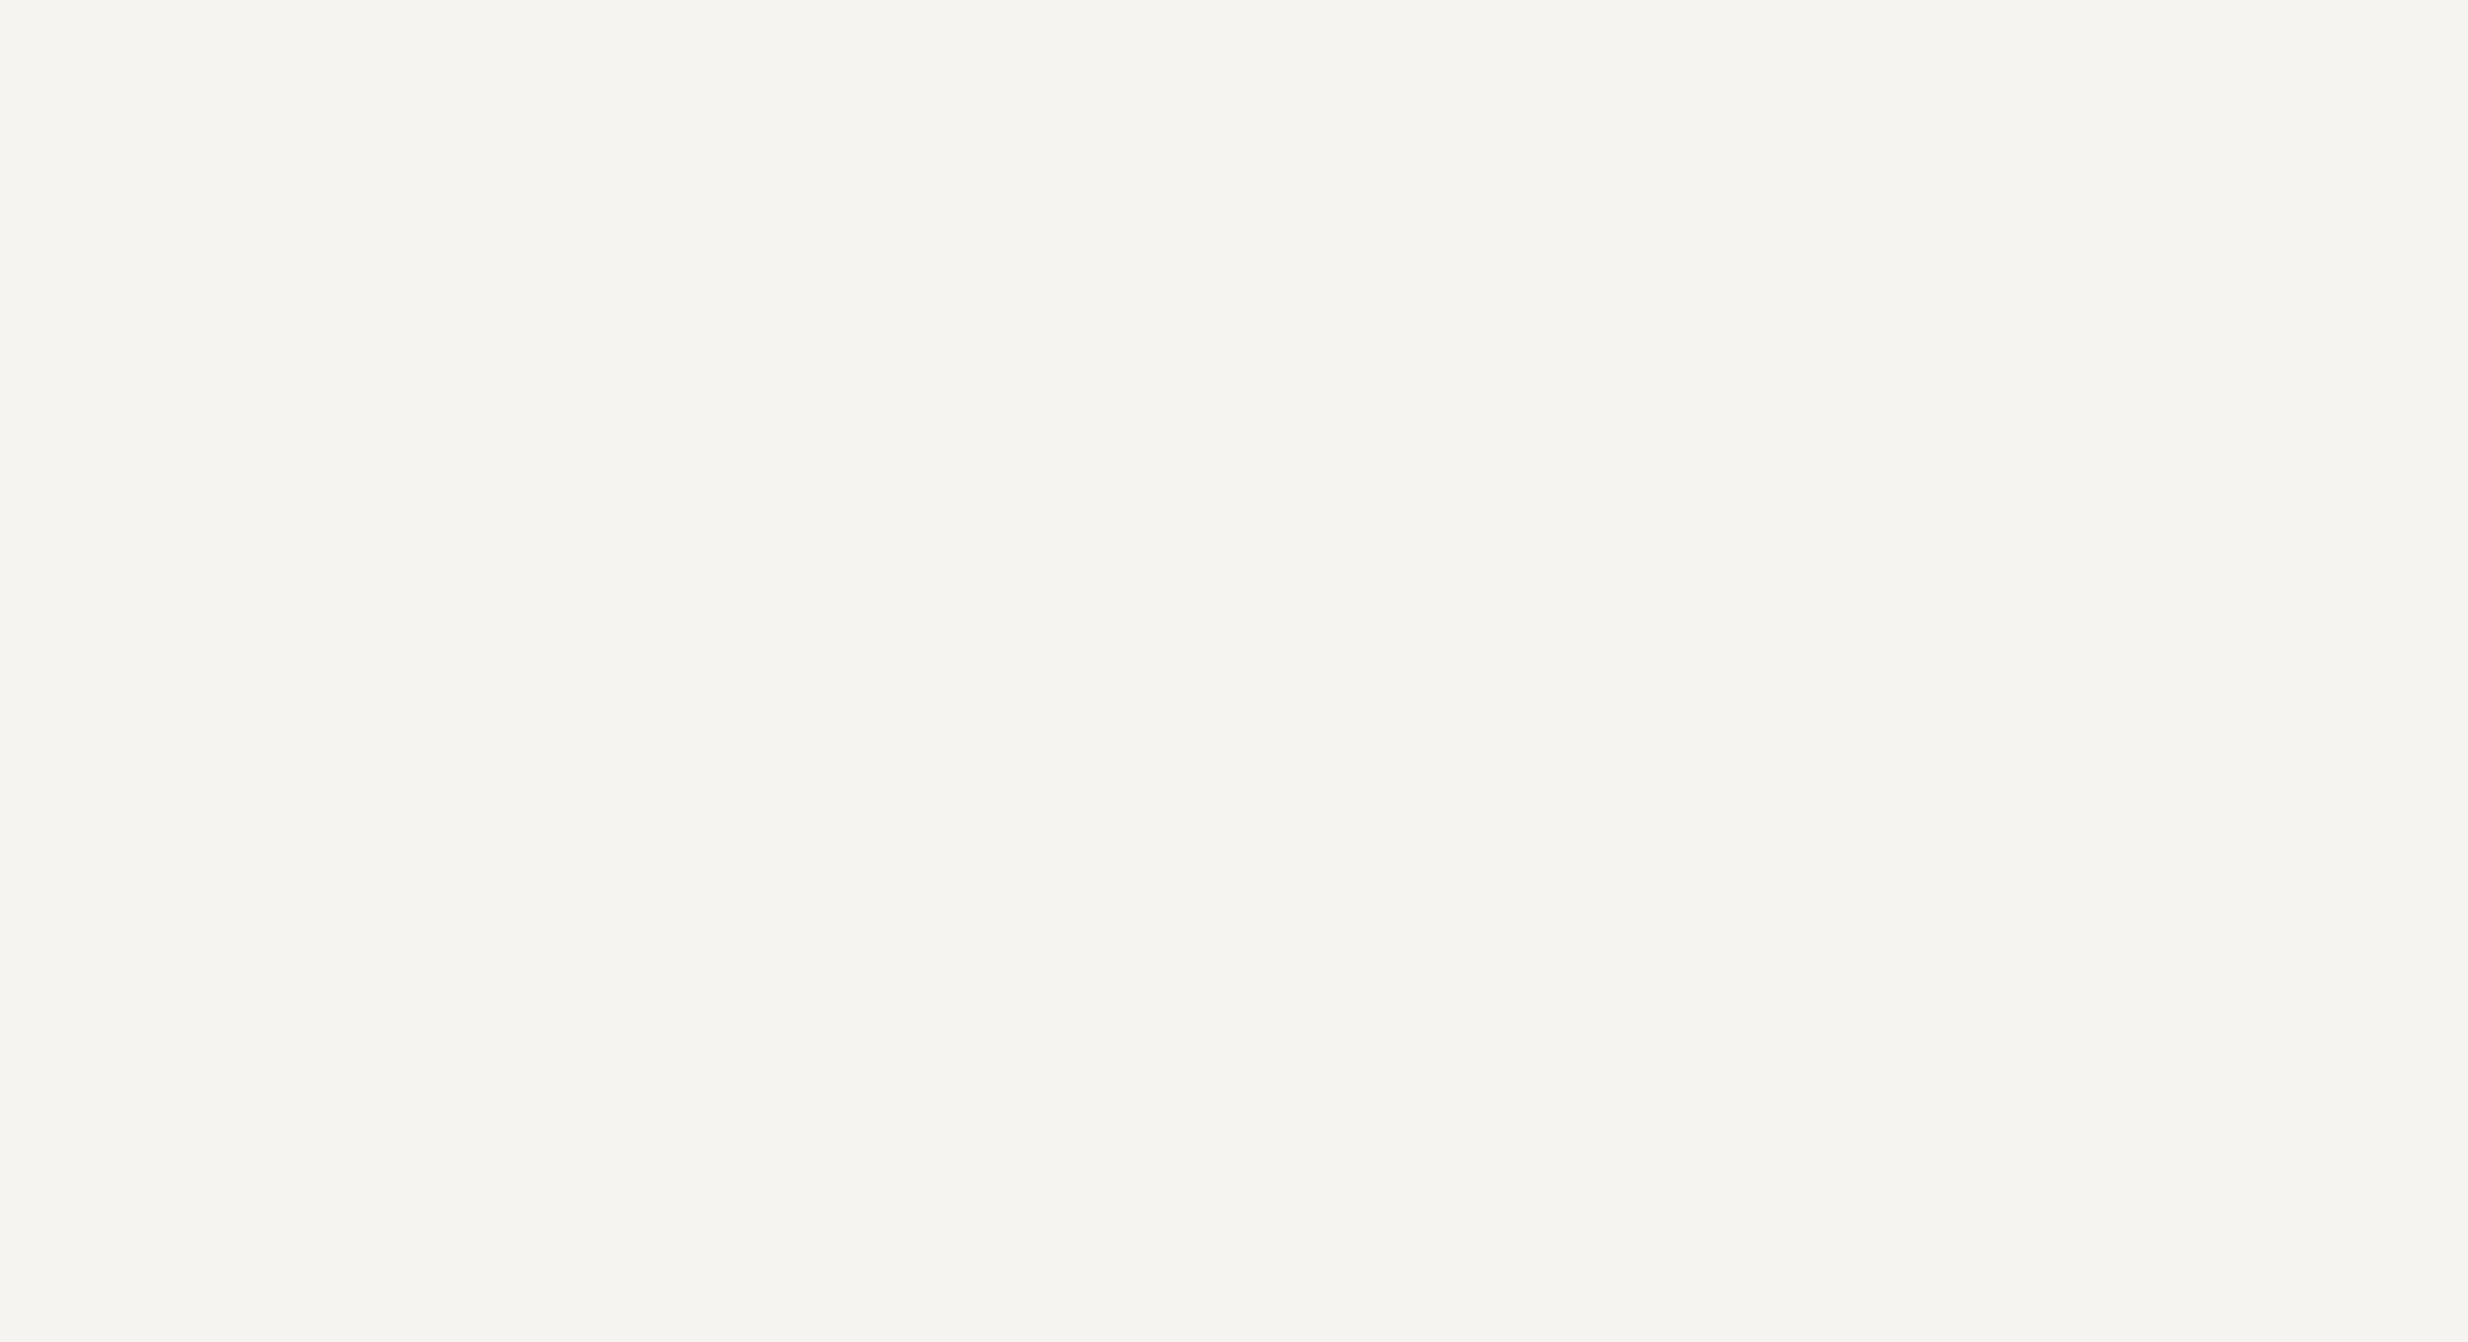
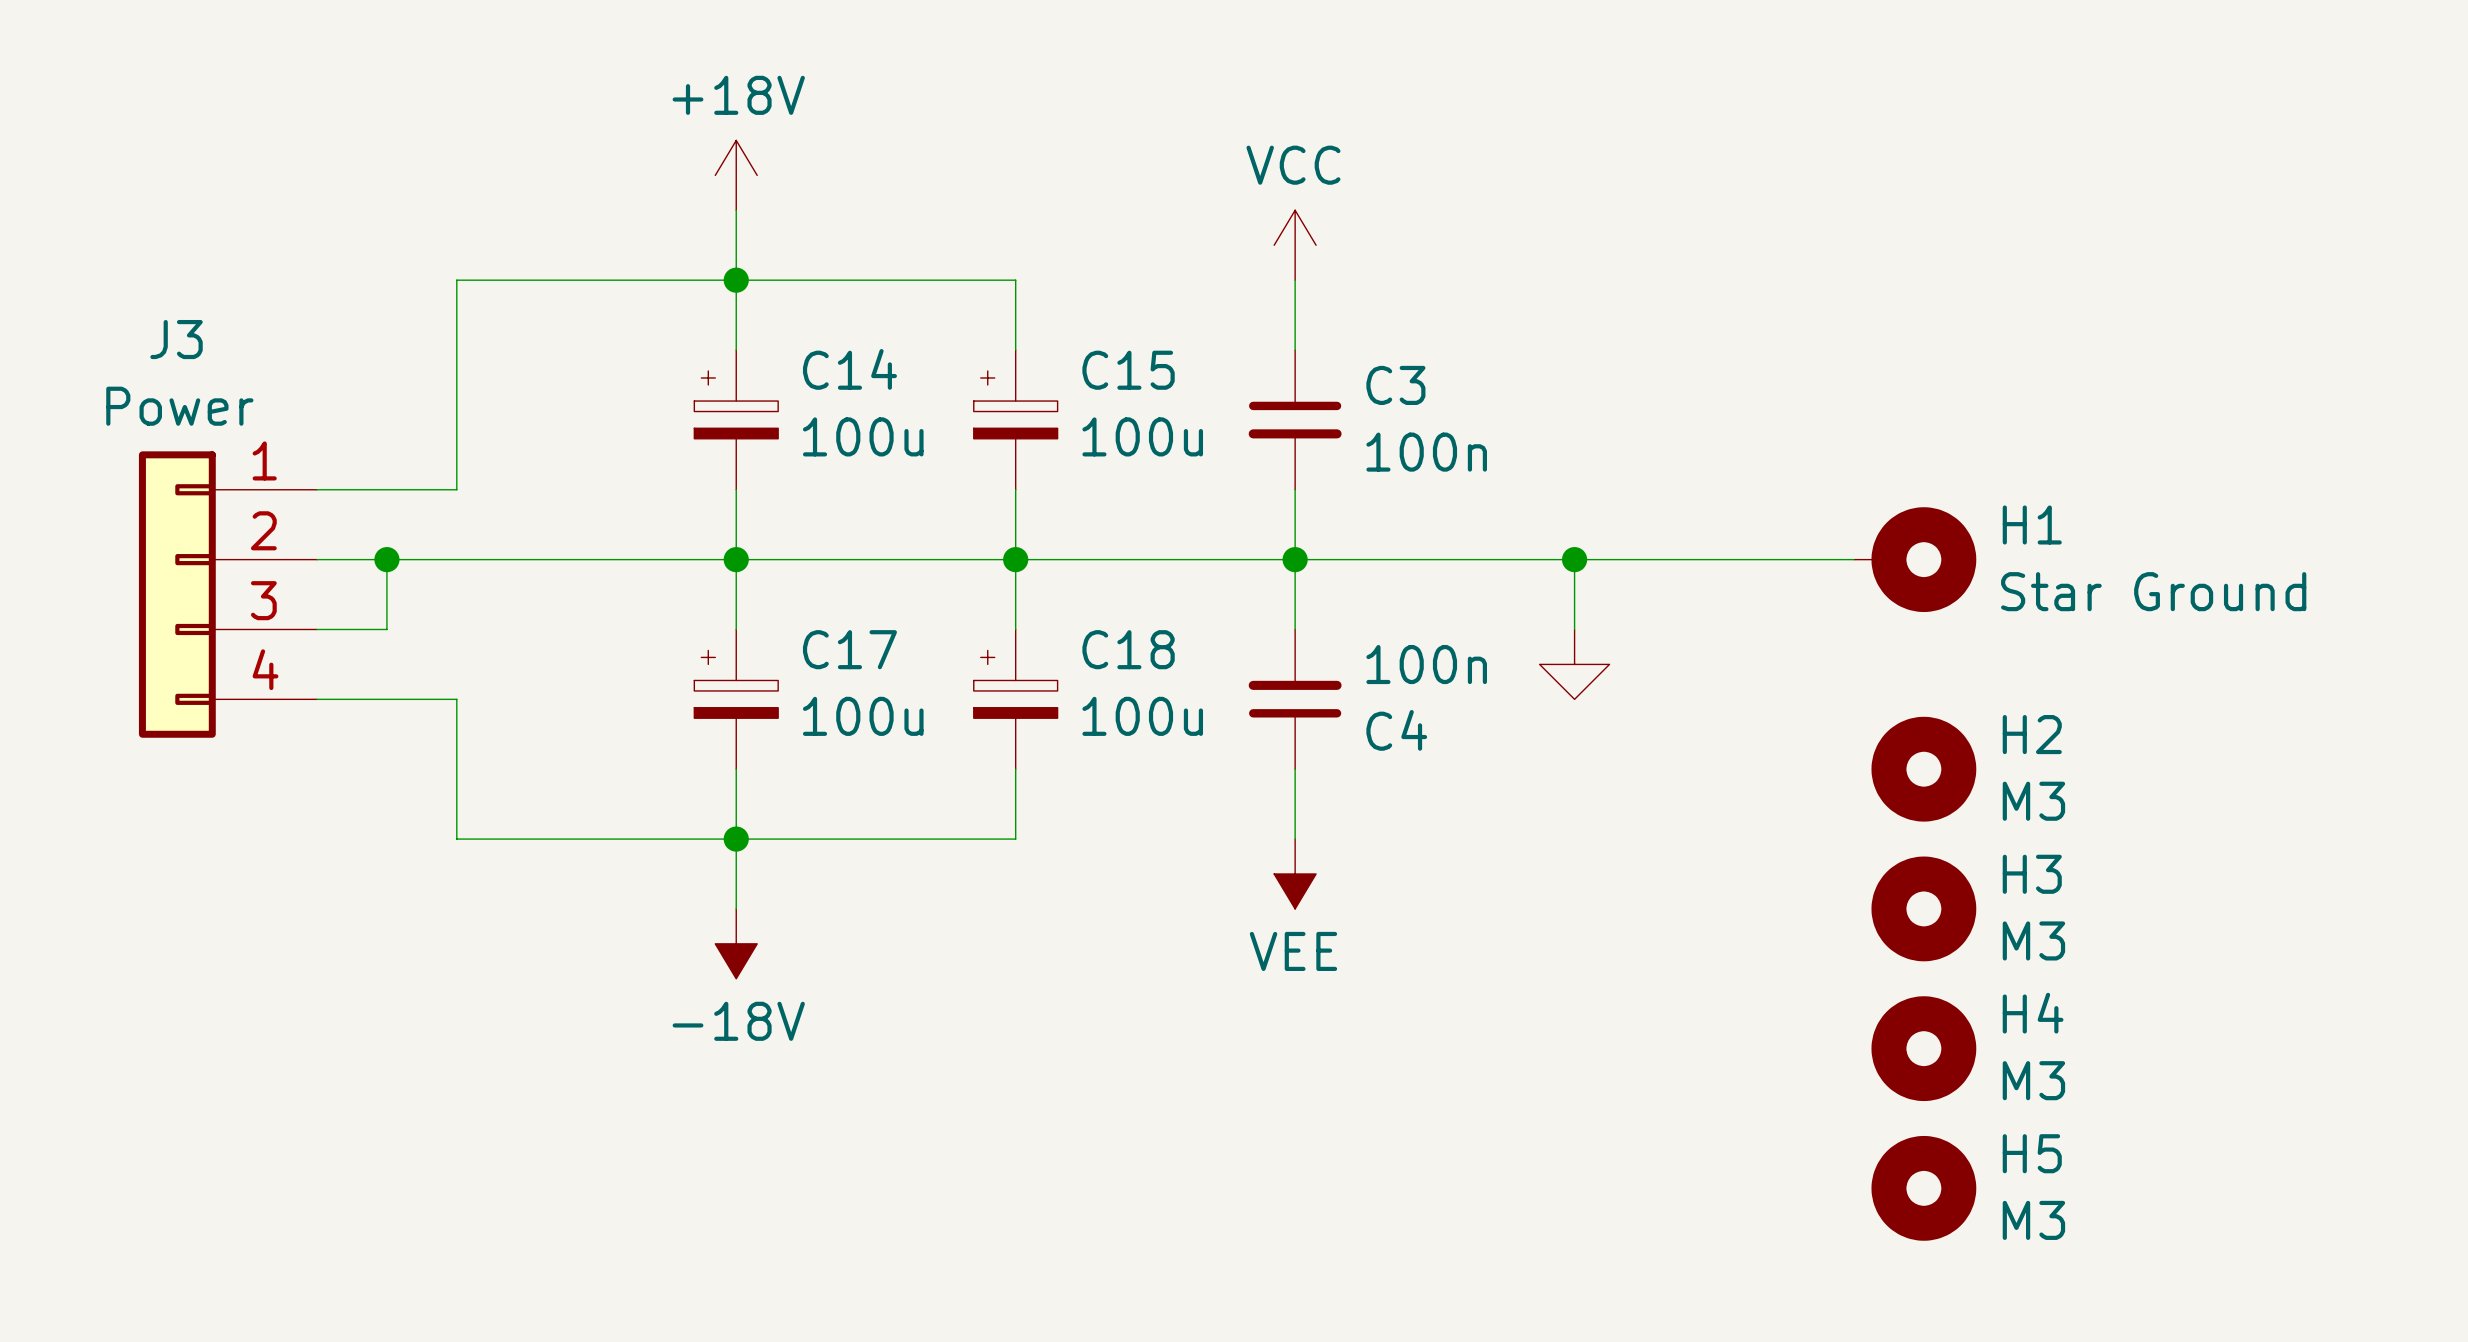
power symbol: none -> +18V (736, 175)
wire: none -> (736, 210) (736, 350)
power symbol: none -> VCC (1295, 245)
junction: none -> (736, 280)
wire: none -> (1295, 280) (1295, 350)
wire: none -> (1015, 350) (1015, 280) (456, 280) (456, 489) (317, 489)
C14: none -> 100u (736, 419)
C15: none -> 100u (1015, 419)
C3: none -> 100n (1295, 419)
wire: none -> (736, 489) (736, 629)
wire: none -> (1015, 489) (1015, 629)
wire: none -> (1295, 489) (1295, 629)
wire: none -> (317, 559) (1854, 559)
wire: none -> (386, 559) (386, 629) (317, 629)
junction: none -> (386, 559)
junction: none -> (736, 559)
junction: none -> (1015, 559)
junction: none -> (1295, 559)
wire: none -> (1574, 559) (1574, 629)
junction: none -> (1574, 559)
H1: none -> Star Ground (1915, 559)
J3: none -> Power (228, 594)
power symbol: none -> (1574, 664)
wire: none -> (317, 699) (456, 699) (456, 839) (1015, 839) (1015, 769)
C17: none -> 100u (736, 699)
C18: none -> 100u (1015, 699)
C4: none -> 100n (1295, 699)
wire: none -> (736, 769) (736, 908)
wire: none -> (1295, 769) (1295, 839)
H2: none -> M3 (1923, 769)
junction: none -> (736, 839)
power symbol: none -> VEE (1295, 873)
H3: none -> M3 (1923, 908)
power symbol: none -> -18V (736, 943)
H4: none -> M3 (1923, 1048)
H5: none -> M3 (1923, 1188)

